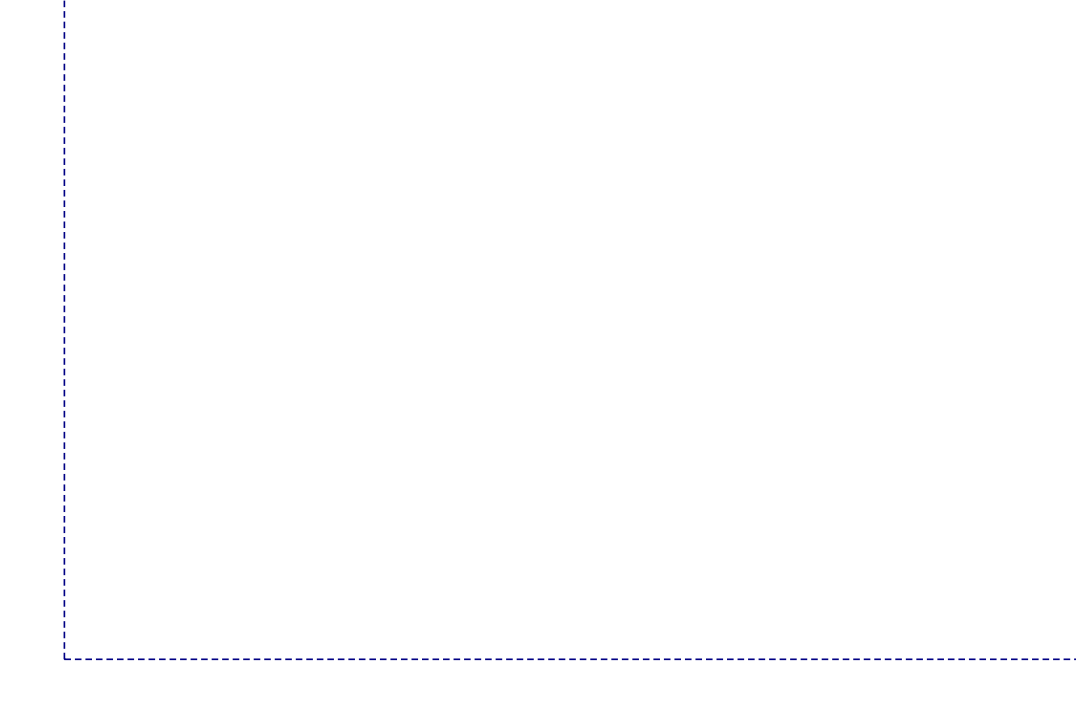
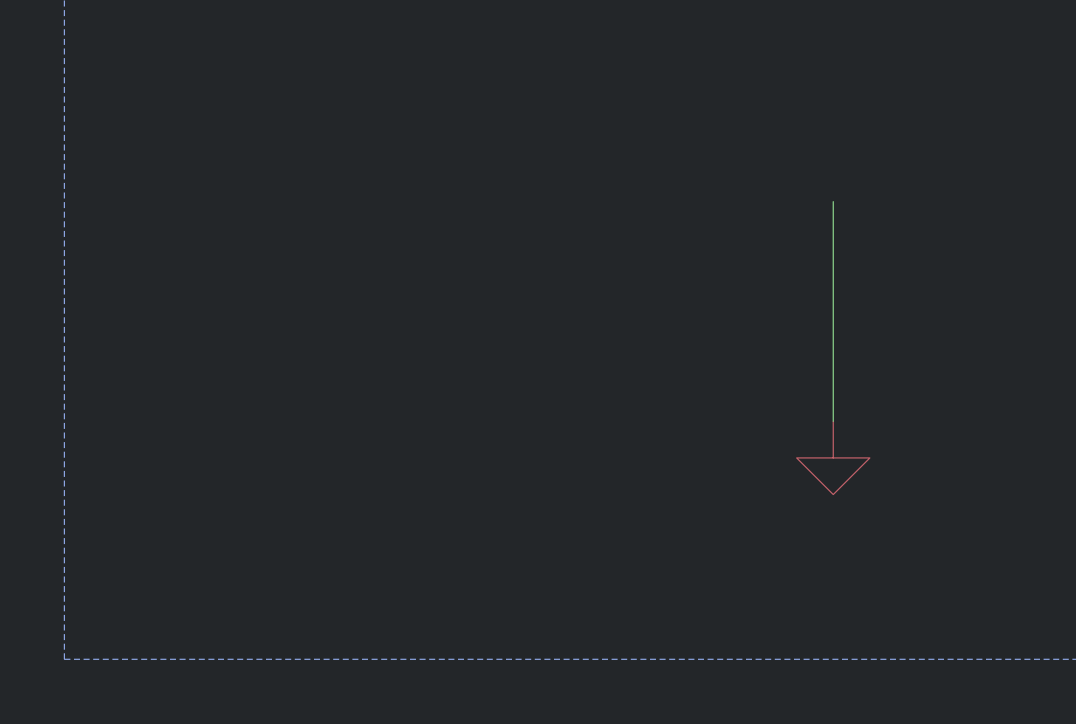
wire: none -> (833, 201) (833, 421)
power symbol: none -> (833, 457)

